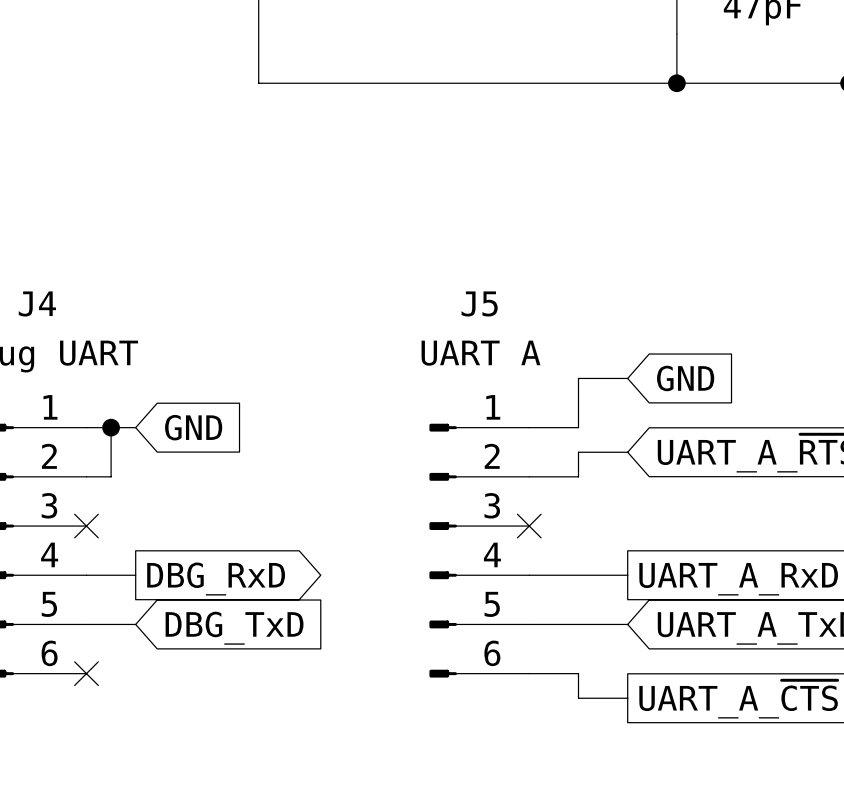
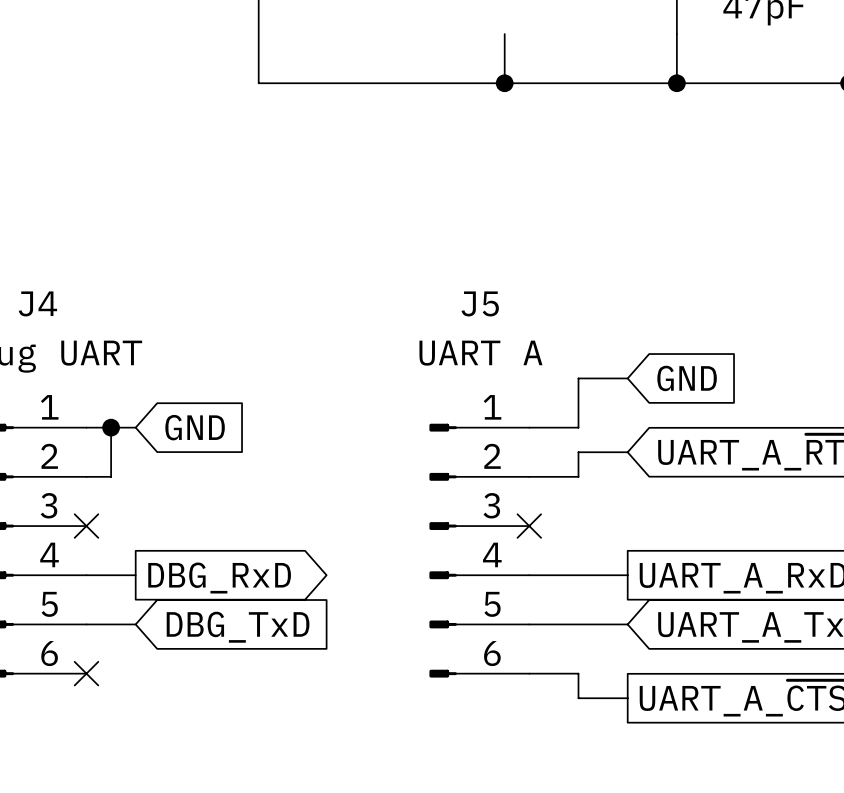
wire: none -> (504, 34) (504, 83)
junction: none -> (504, 83)

